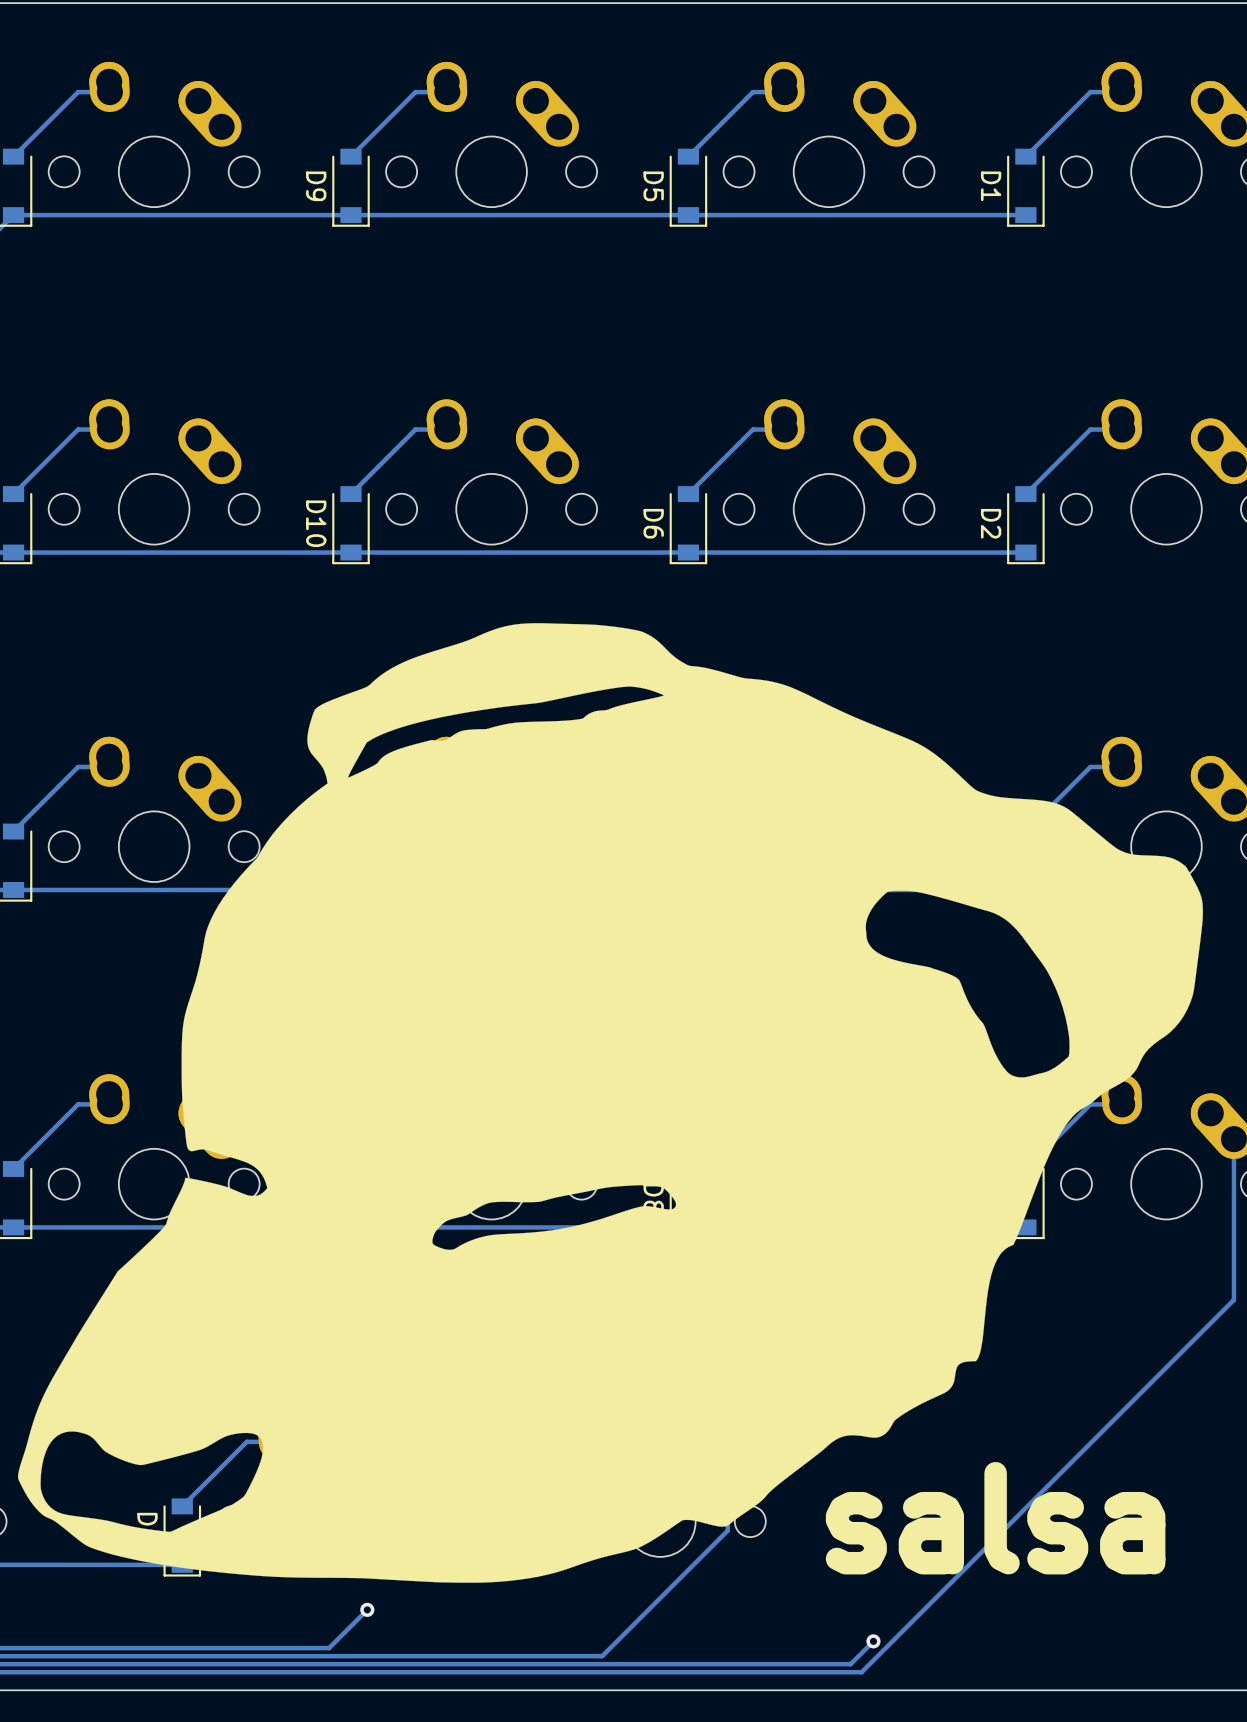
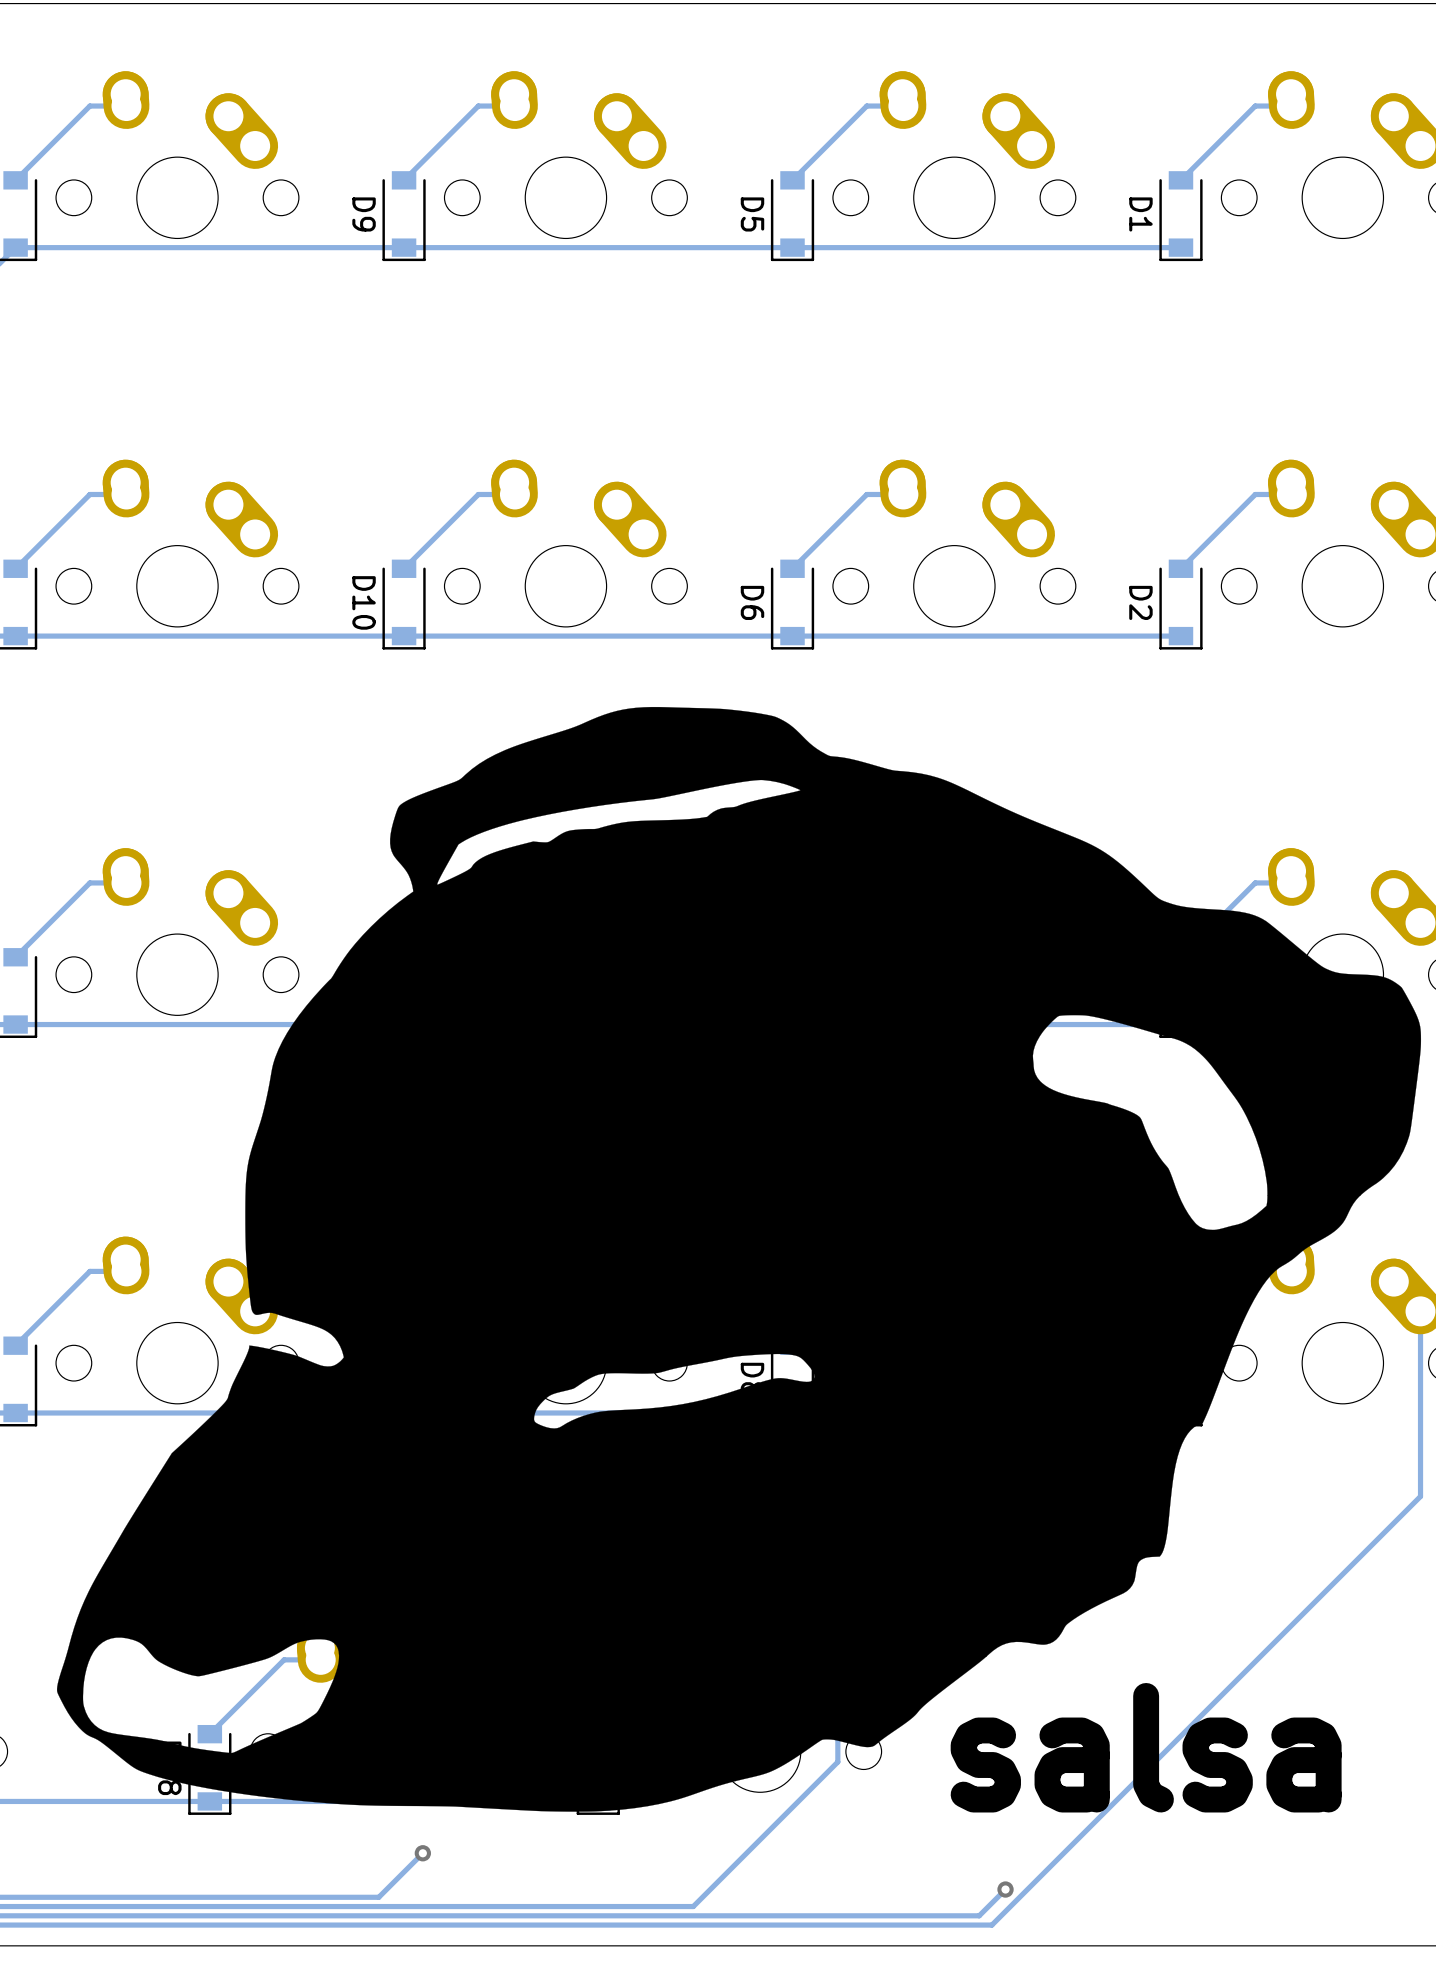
drawing position: (610, 1102) -> (739, 1259)

